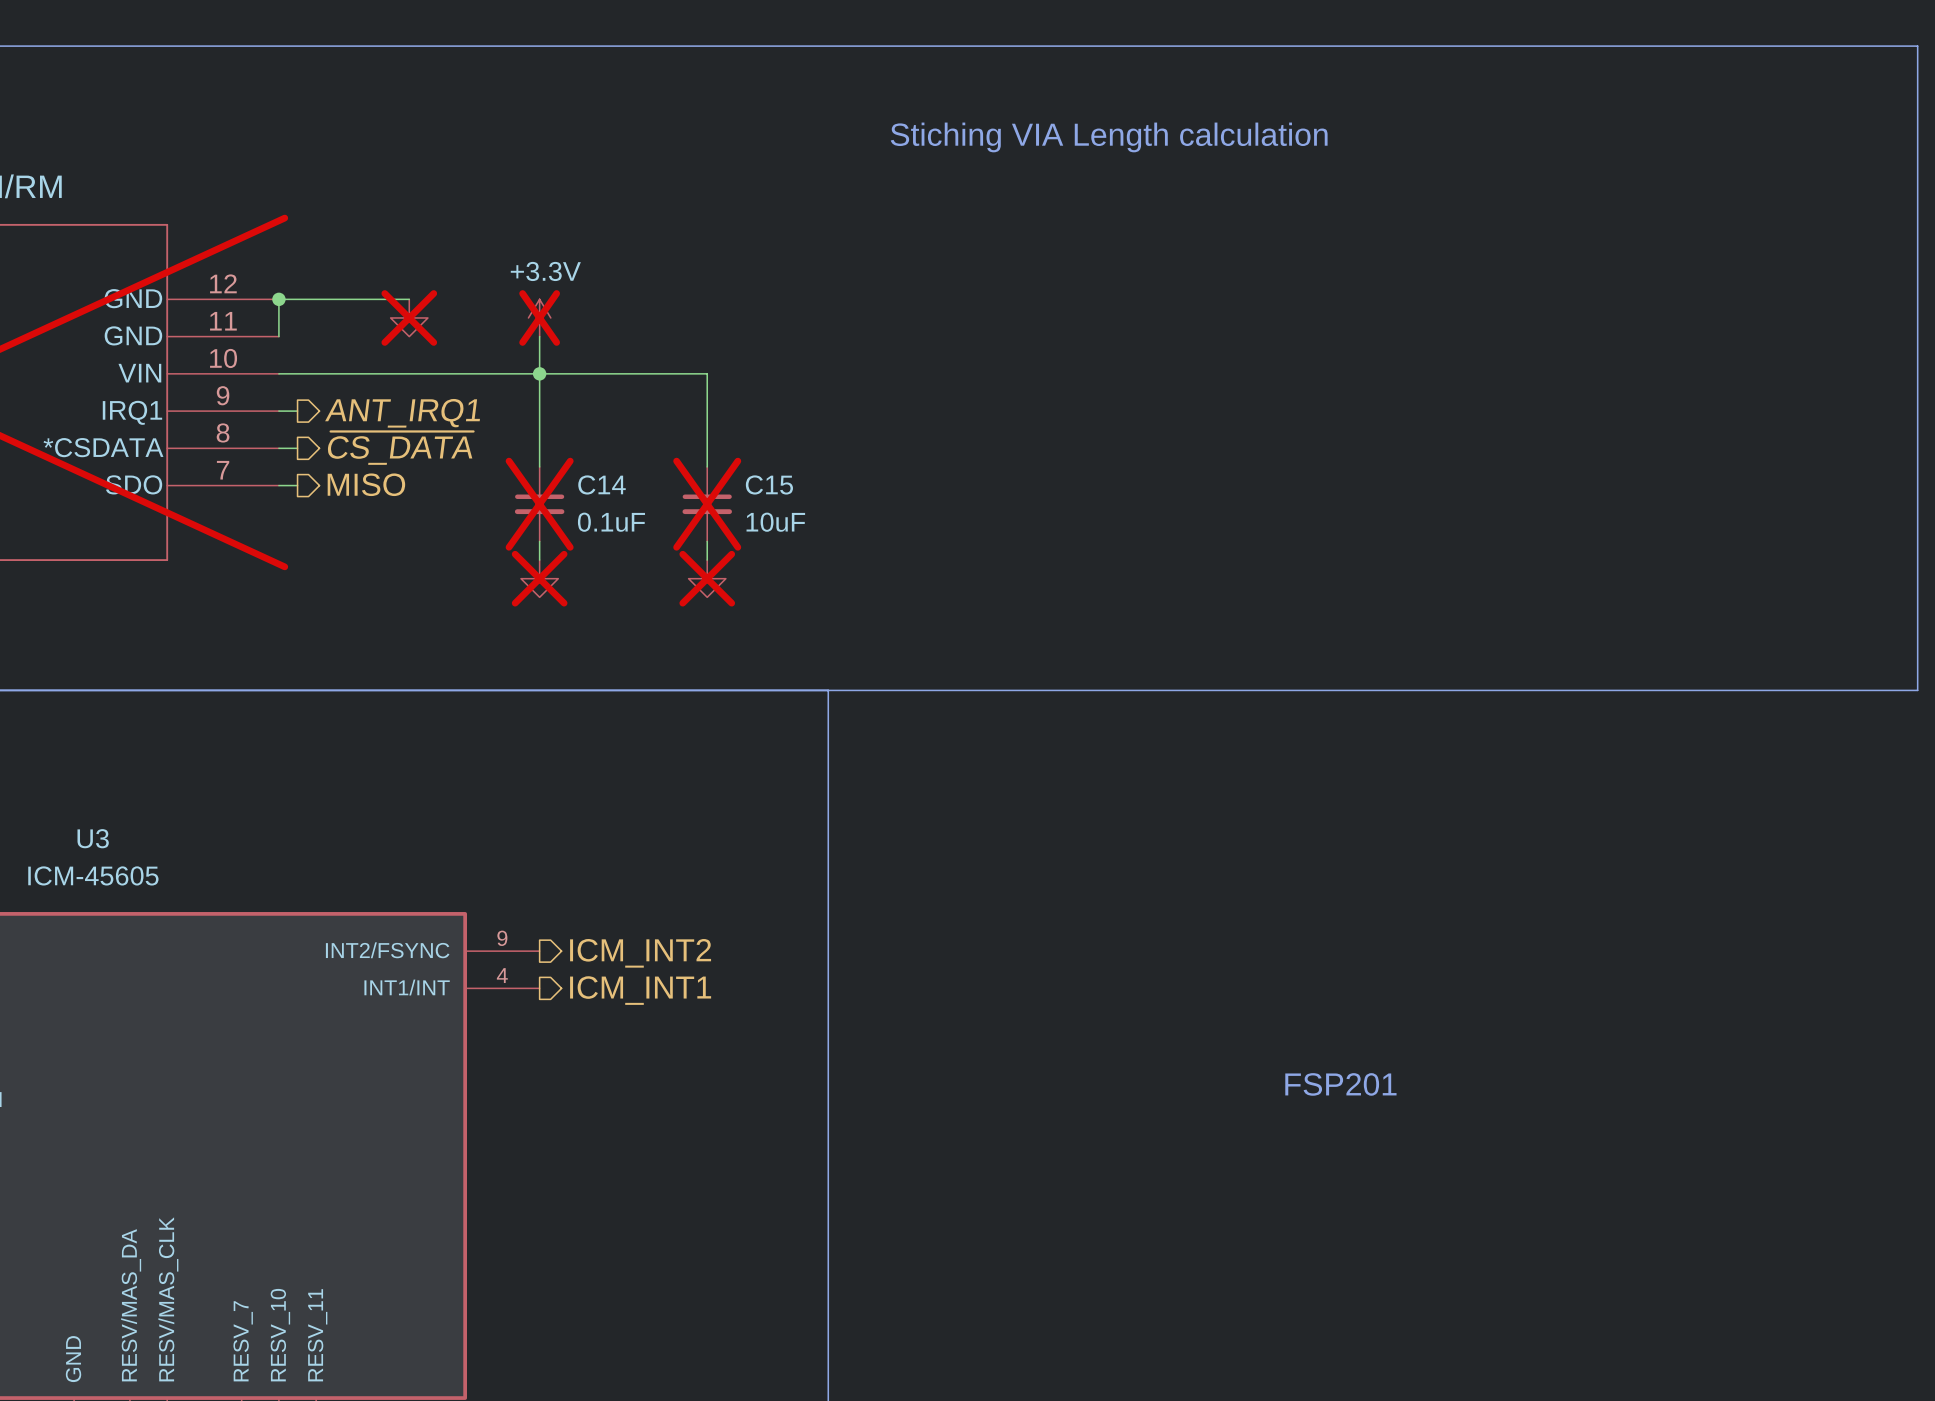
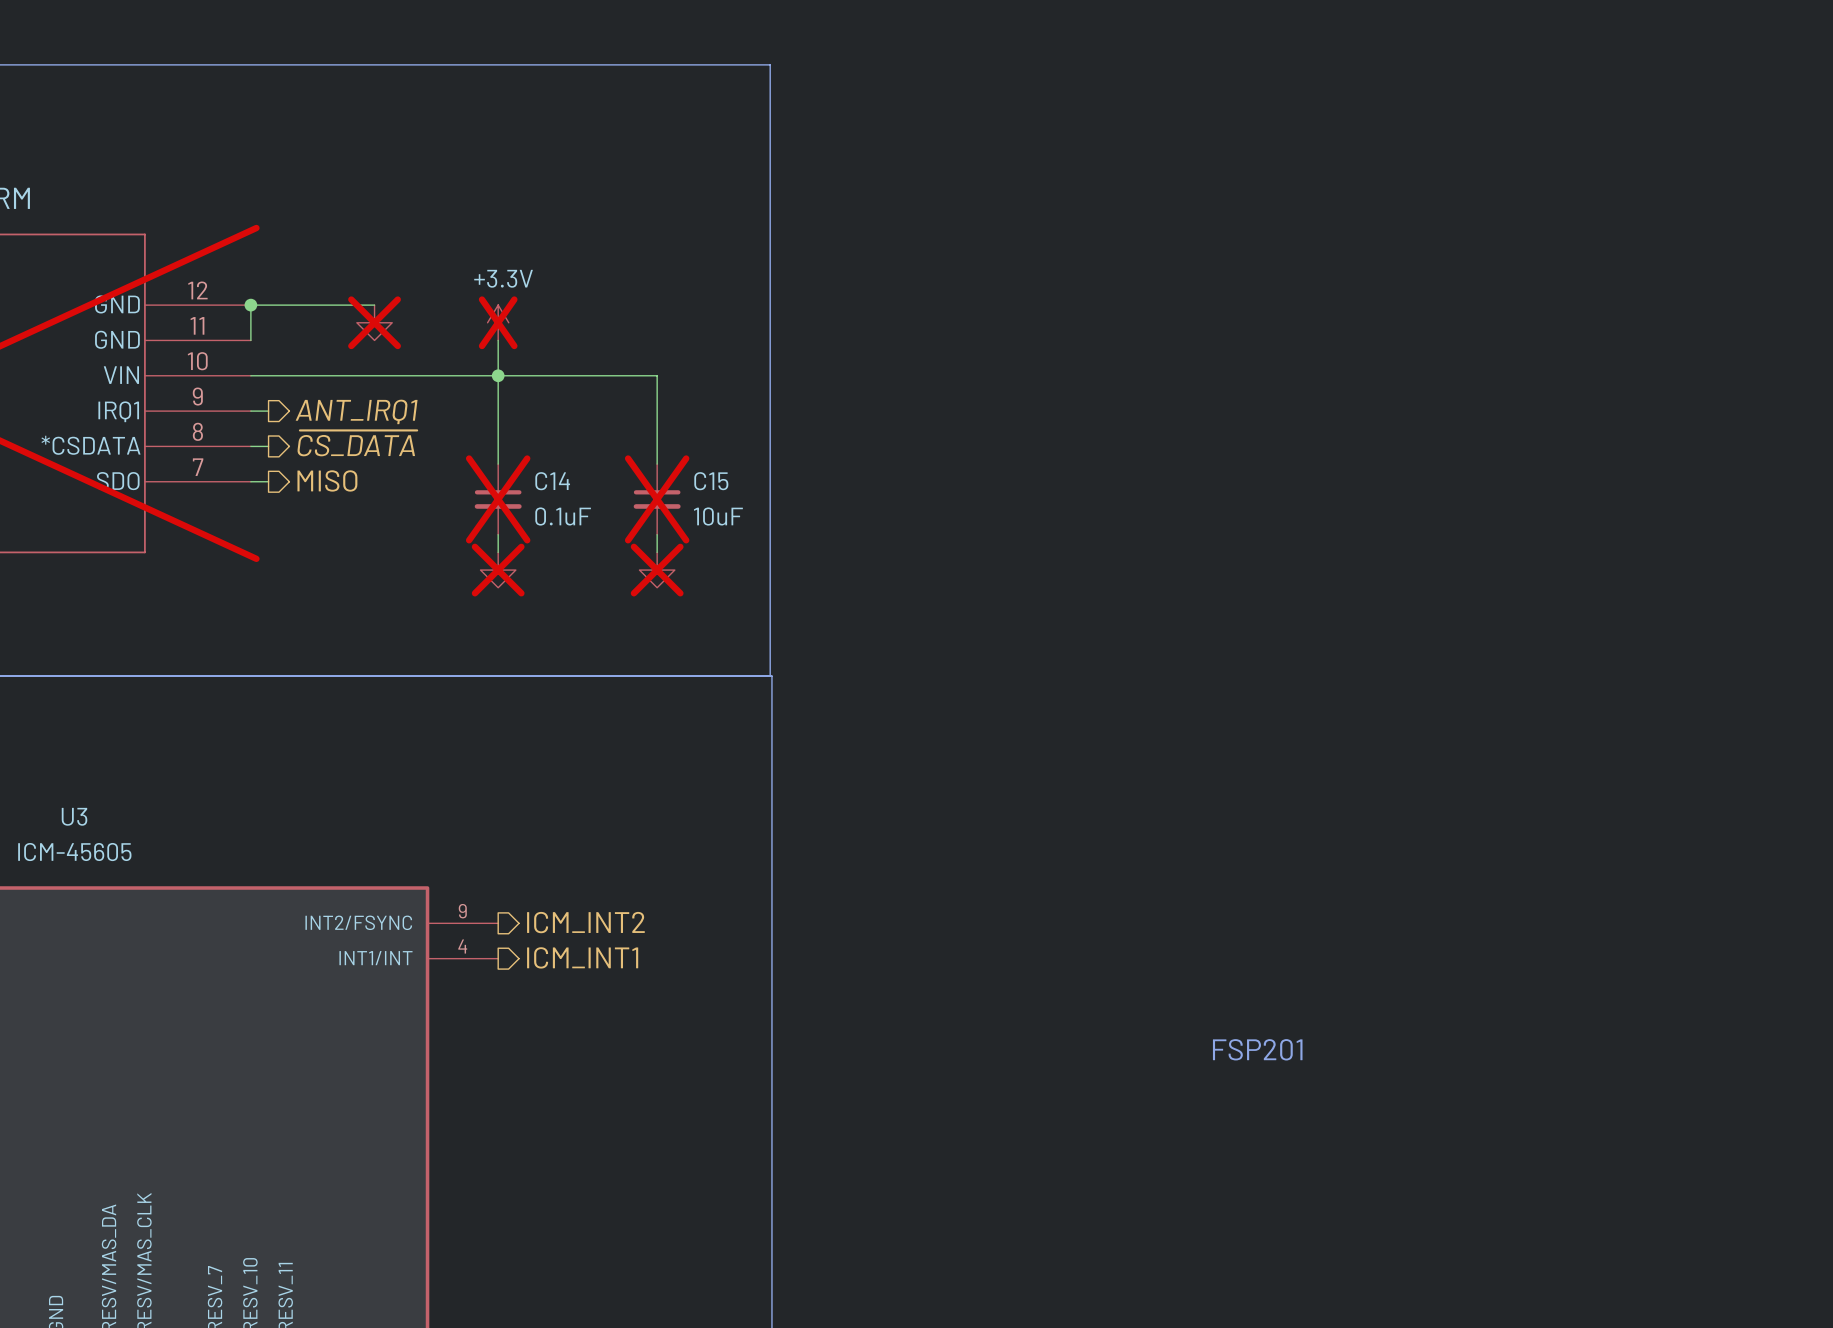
line: (826, 46) (1917, 46) (1917, 690) (828, 690) -> (770, 64) (770, 676)
text: Stiching VIA Length calculation (1109, 137) -> none

